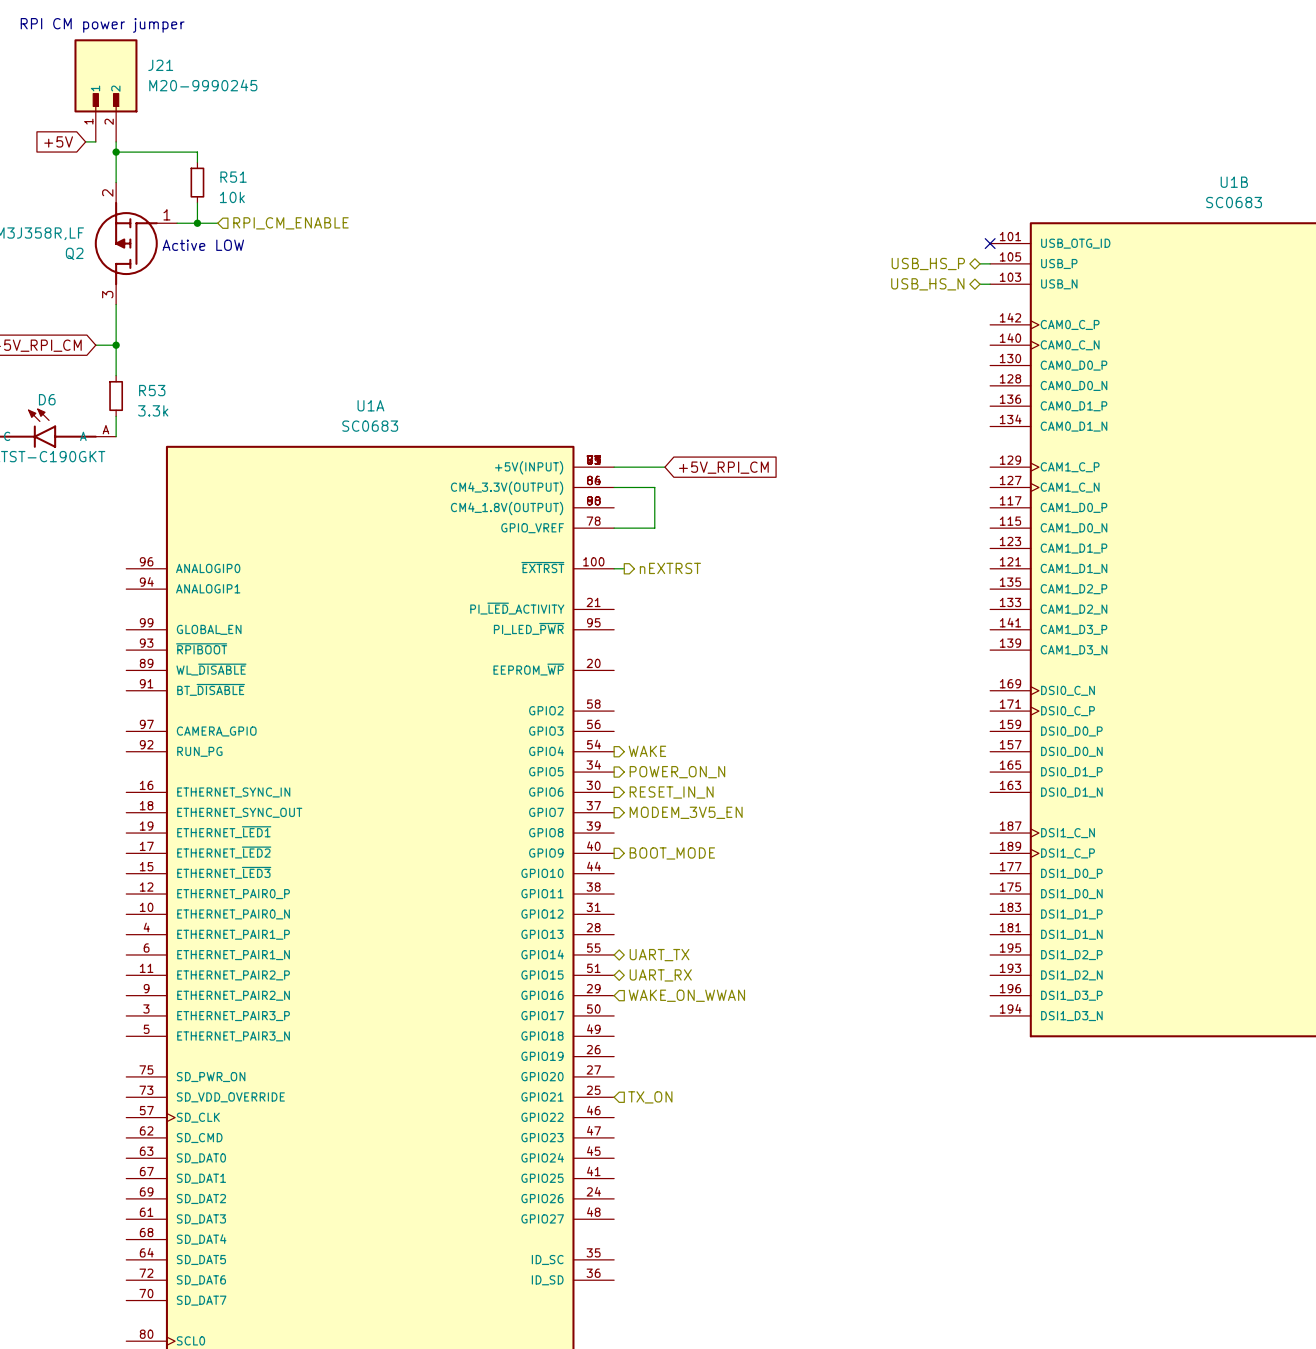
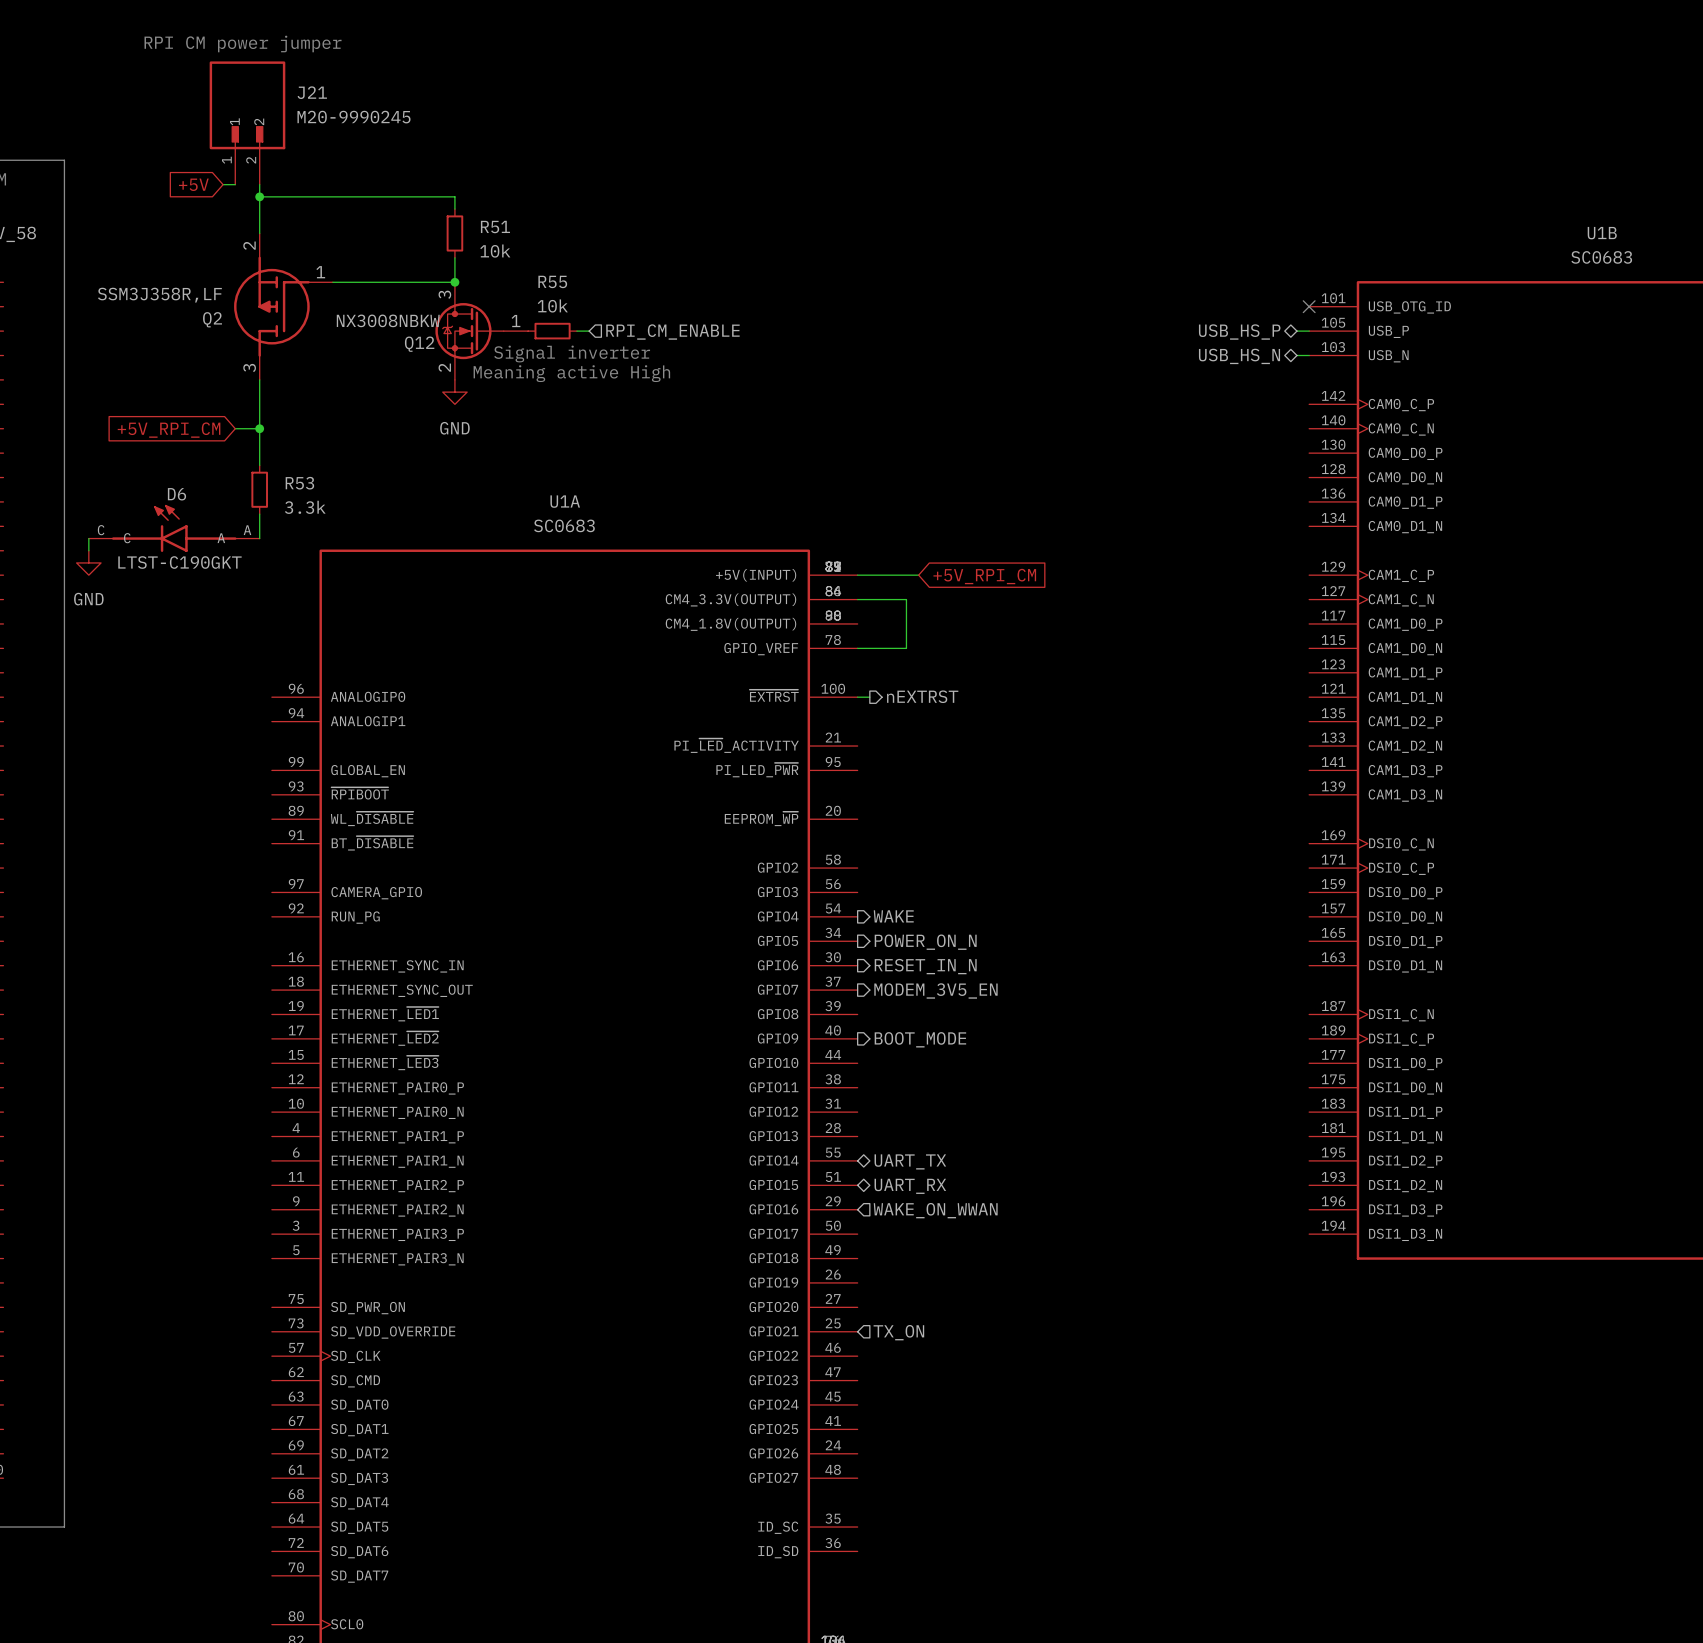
wire: (197, 152) (197, 162) -> (357, 196) (454, 196) (454, 209)
R51 position: (197, 182) -> (454, 233)
wire: (197, 202) (197, 223) -> none
wire: none -> (454, 257) (454, 282) (381, 282)
junction: (197, 223) -> none
junction: none -> (454, 282)
hierarchical label position: RPI_CM_ENABLE (290, 223) -> RPI_CM_ENABLE (672, 332)
text: Active LOW (203, 245) -> none
Q12: none -> NX3008NBKW (481, 331)
R55: none -> 10k (552, 331)
wire: none -> (576, 331) (589, 331)
text: none -> Signal inverter (572, 354)
text: none -> Meaning active High (571, 373)
power symbol: none -> GND (454, 392)

